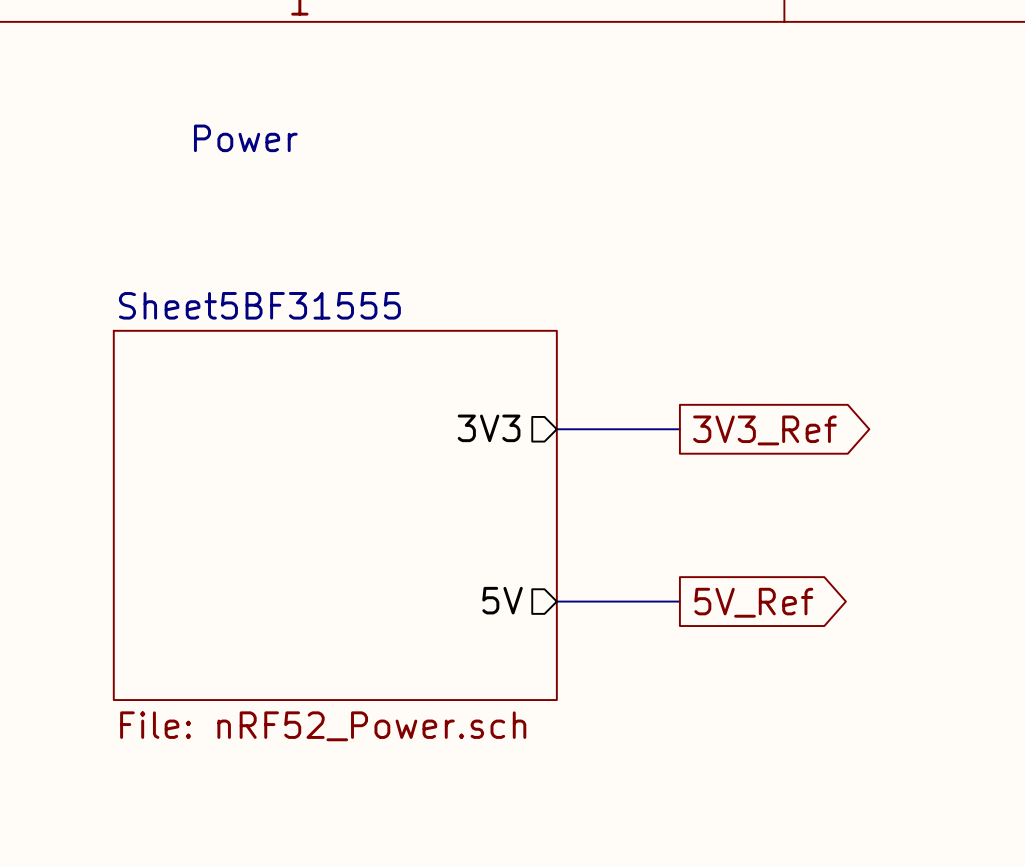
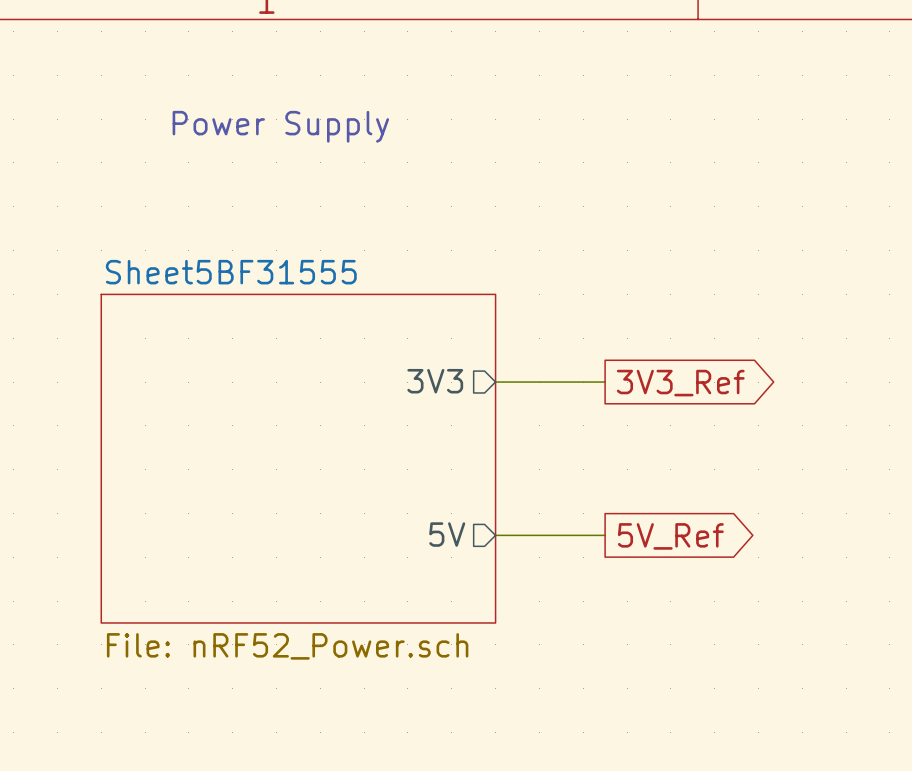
text: Power (245, 138) -> Power Supply (280, 126)

